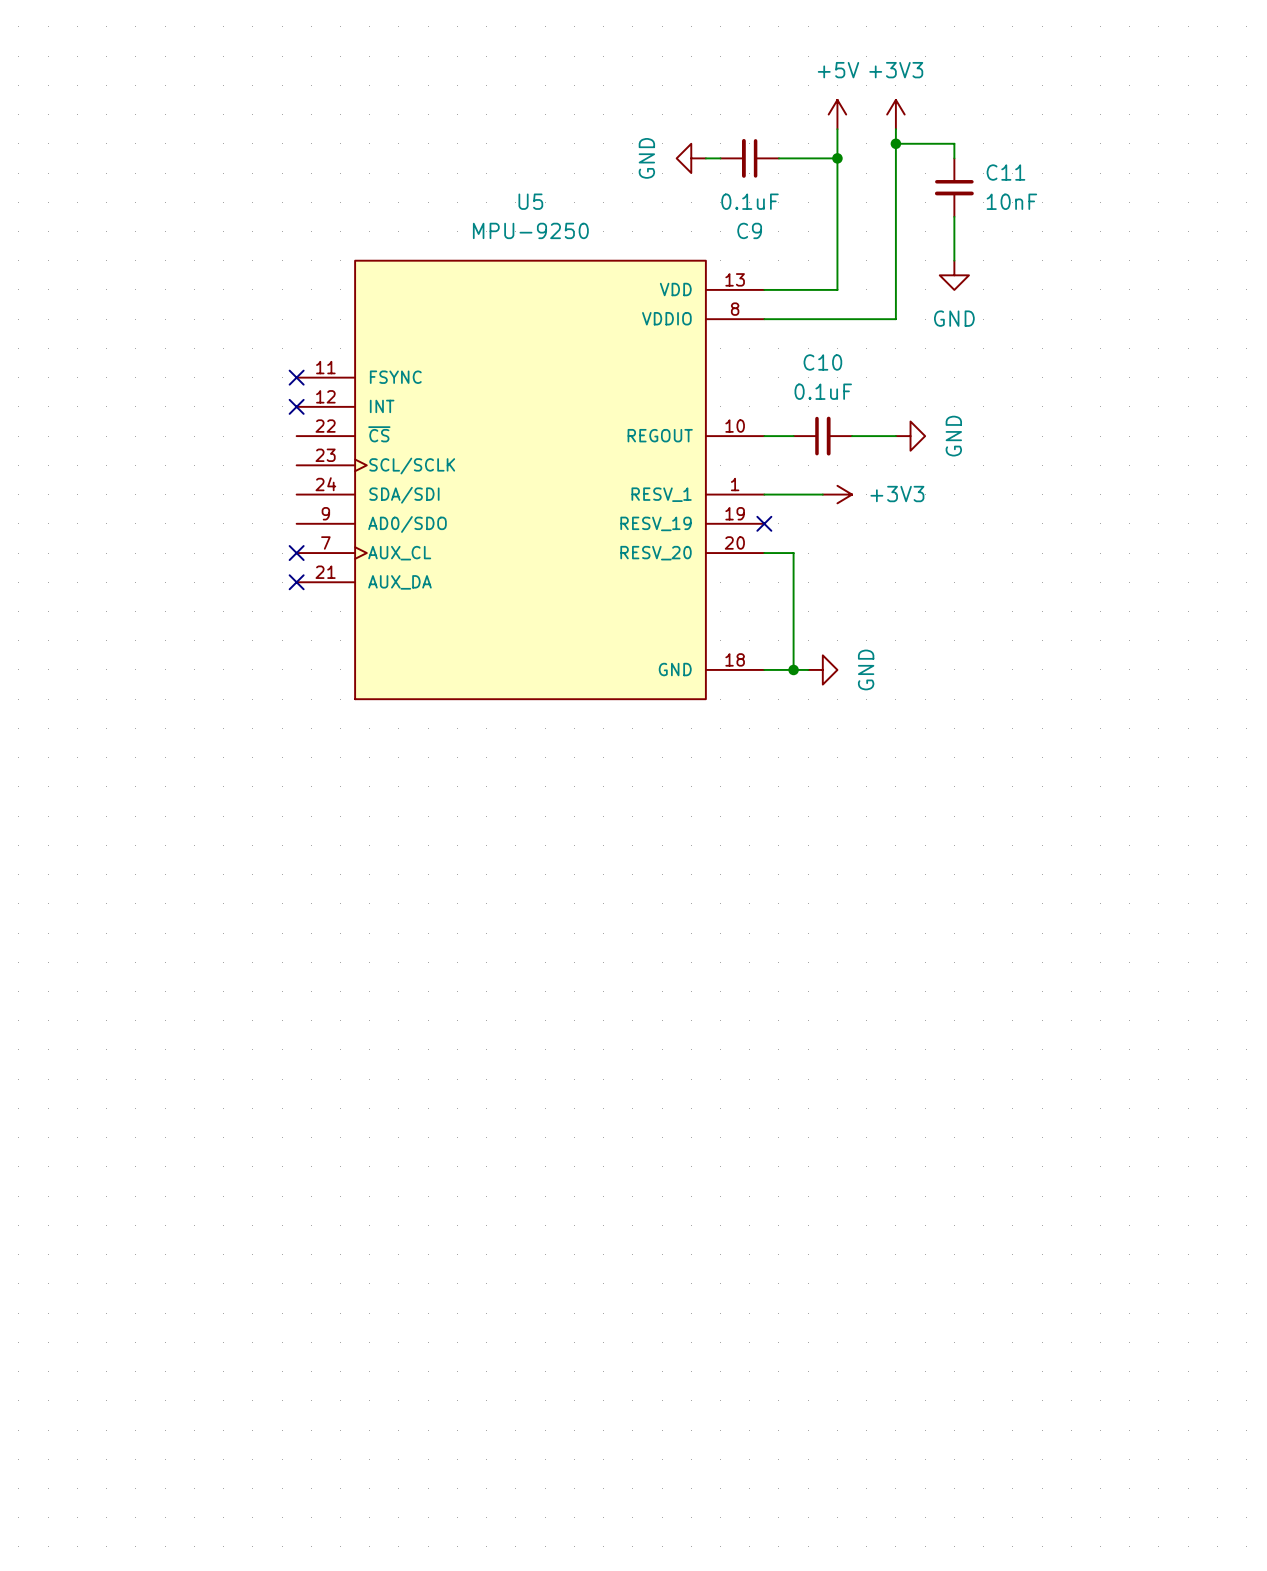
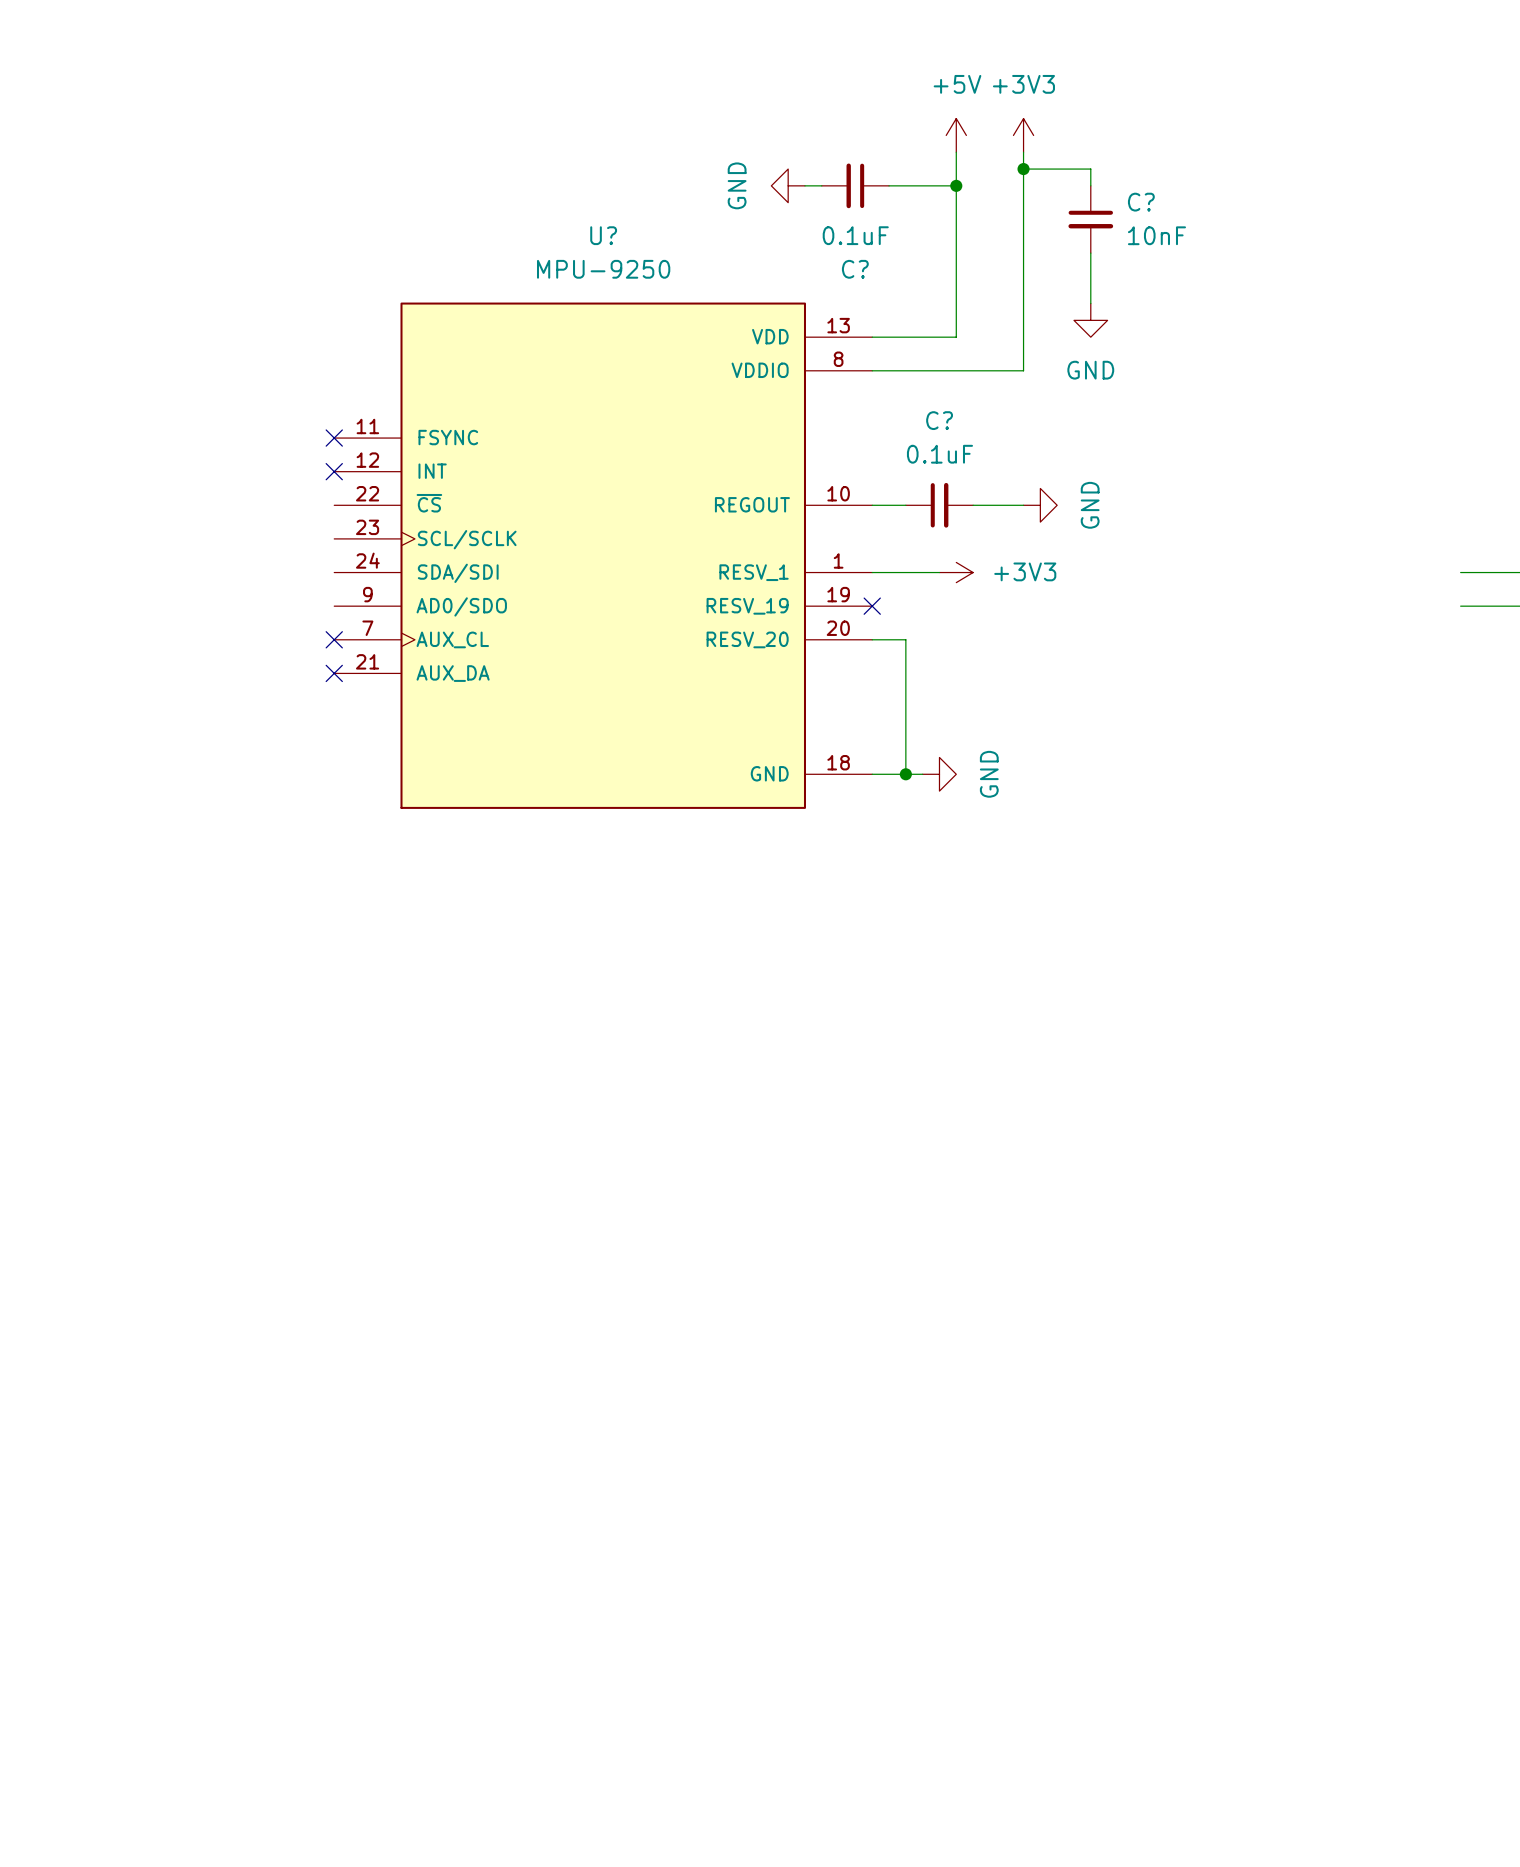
C11 name: C11 (1005, 172) -> C? (1141, 202)
U5 name: U5 (530, 201) -> U? (603, 235)
C9 name: C9 (749, 230) -> C? (855, 269)
C10 name: C10 (822, 362) -> C? (939, 420)

